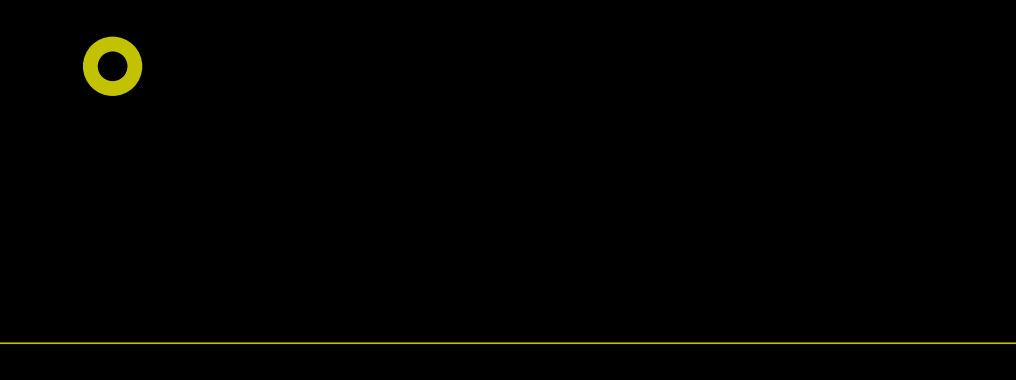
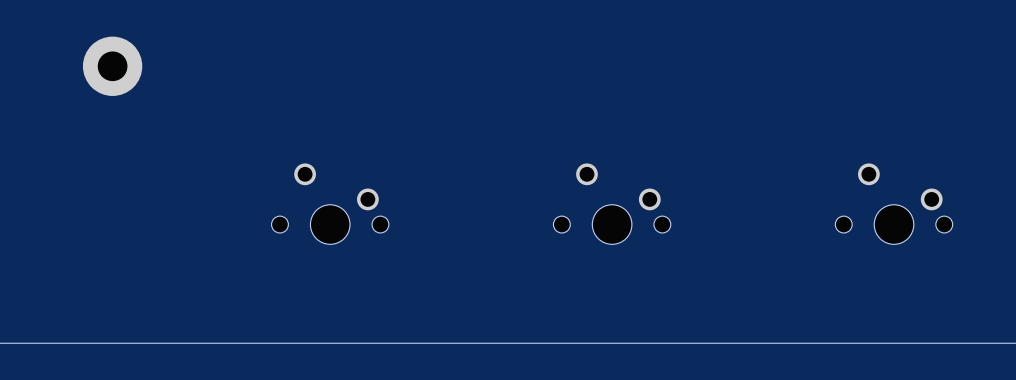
part: none -> (330, 203)
part: none -> (612, 203)
part: none -> (894, 203)

